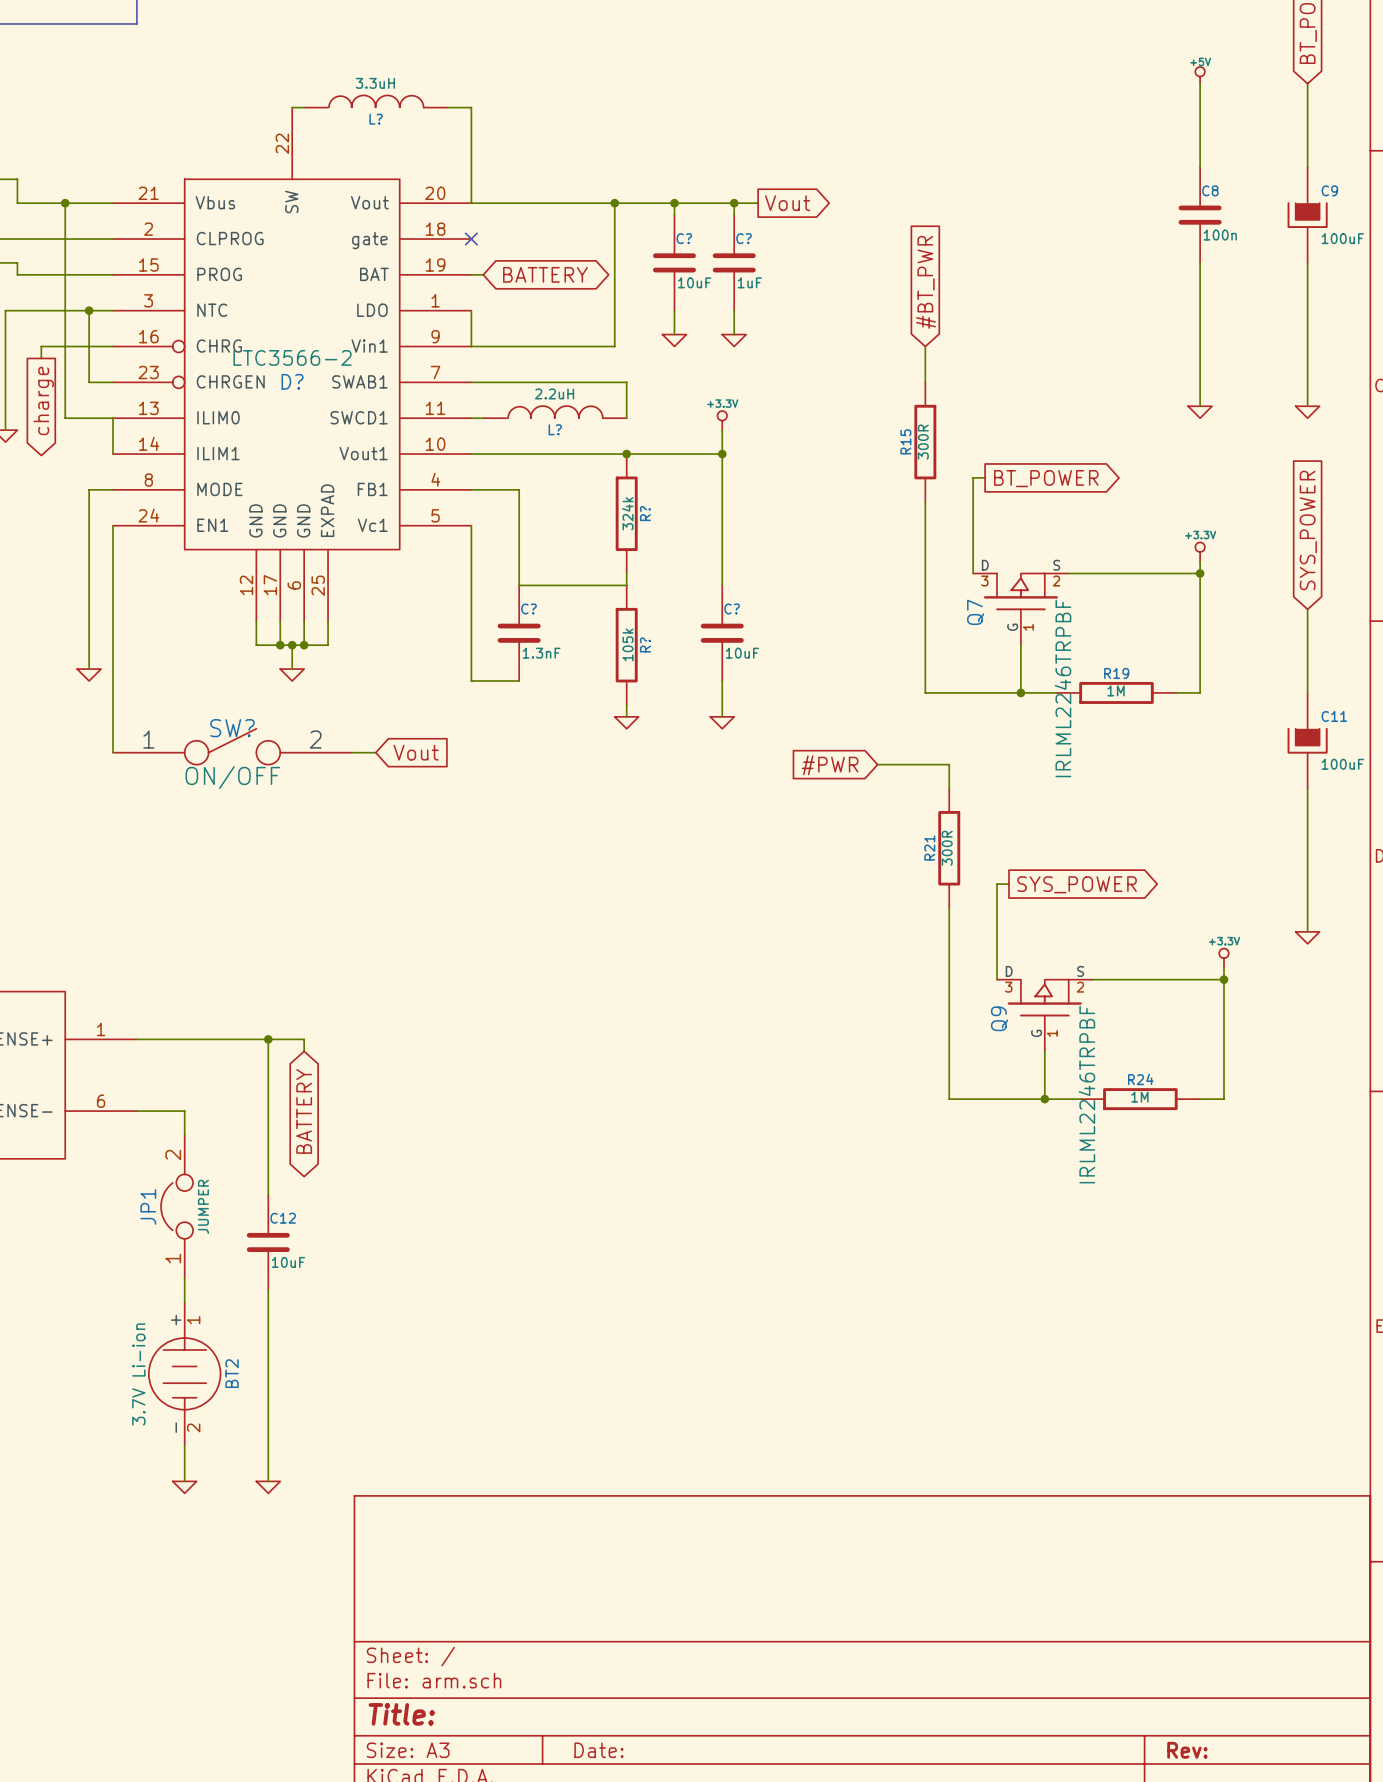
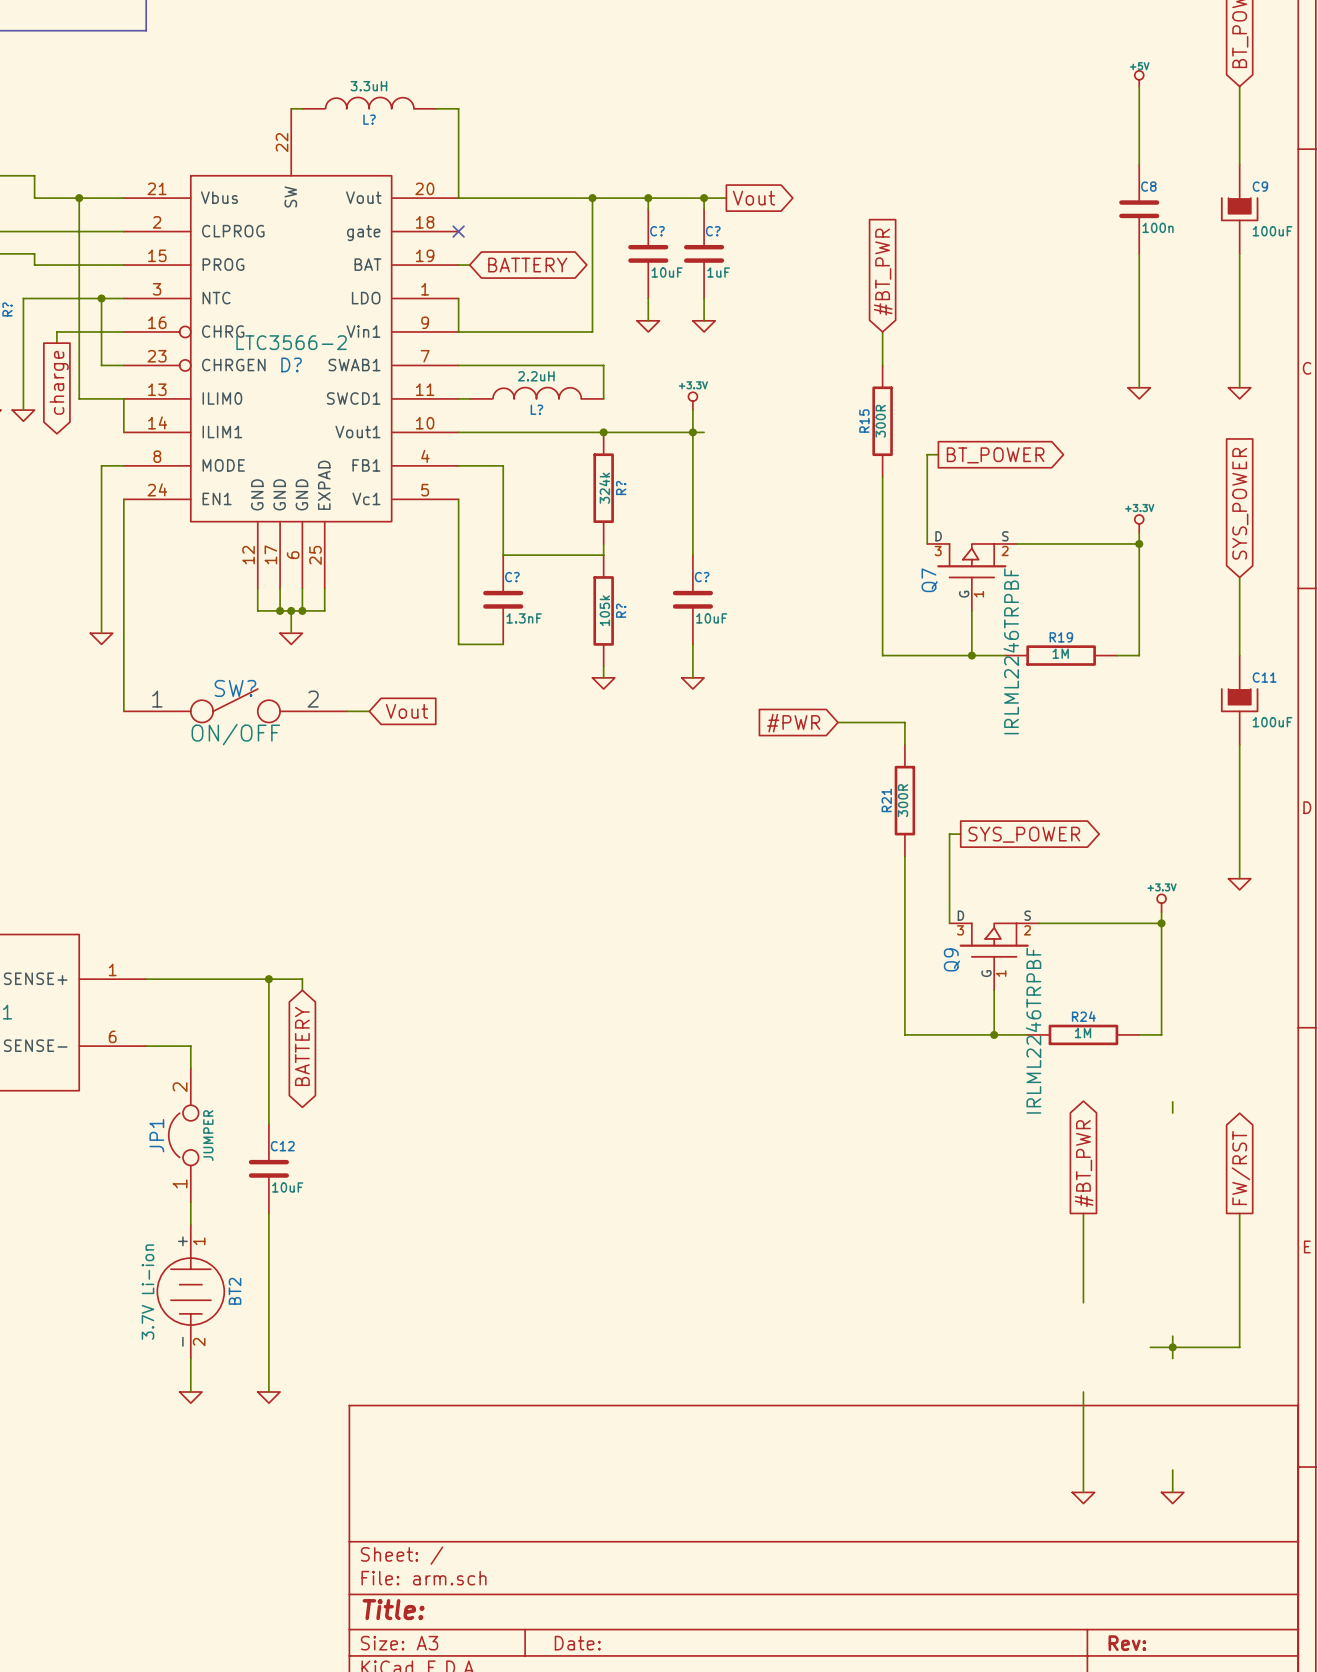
wire: none -> (692, 432) (704, 432)
wire: none -> (1172, 1101) (1172, 1113)
global label: none -> #BT_PWR (1084, 1163)
global label: none -> FW/RST (1240, 1168)
wire: none -> (1083, 1213) (1083, 1302)
wire: none -> (1239, 1213) (1239, 1347) (1150, 1347)
wire: none -> (1172, 1336) (1172, 1358)
junction: none -> (1172, 1347)
wire: none -> (1083, 1391) (1083, 1492)
wire: none -> (1172, 1470) (1172, 1492)
power symbol: none -> (1083, 1498)
power symbol: none -> (1172, 1498)

